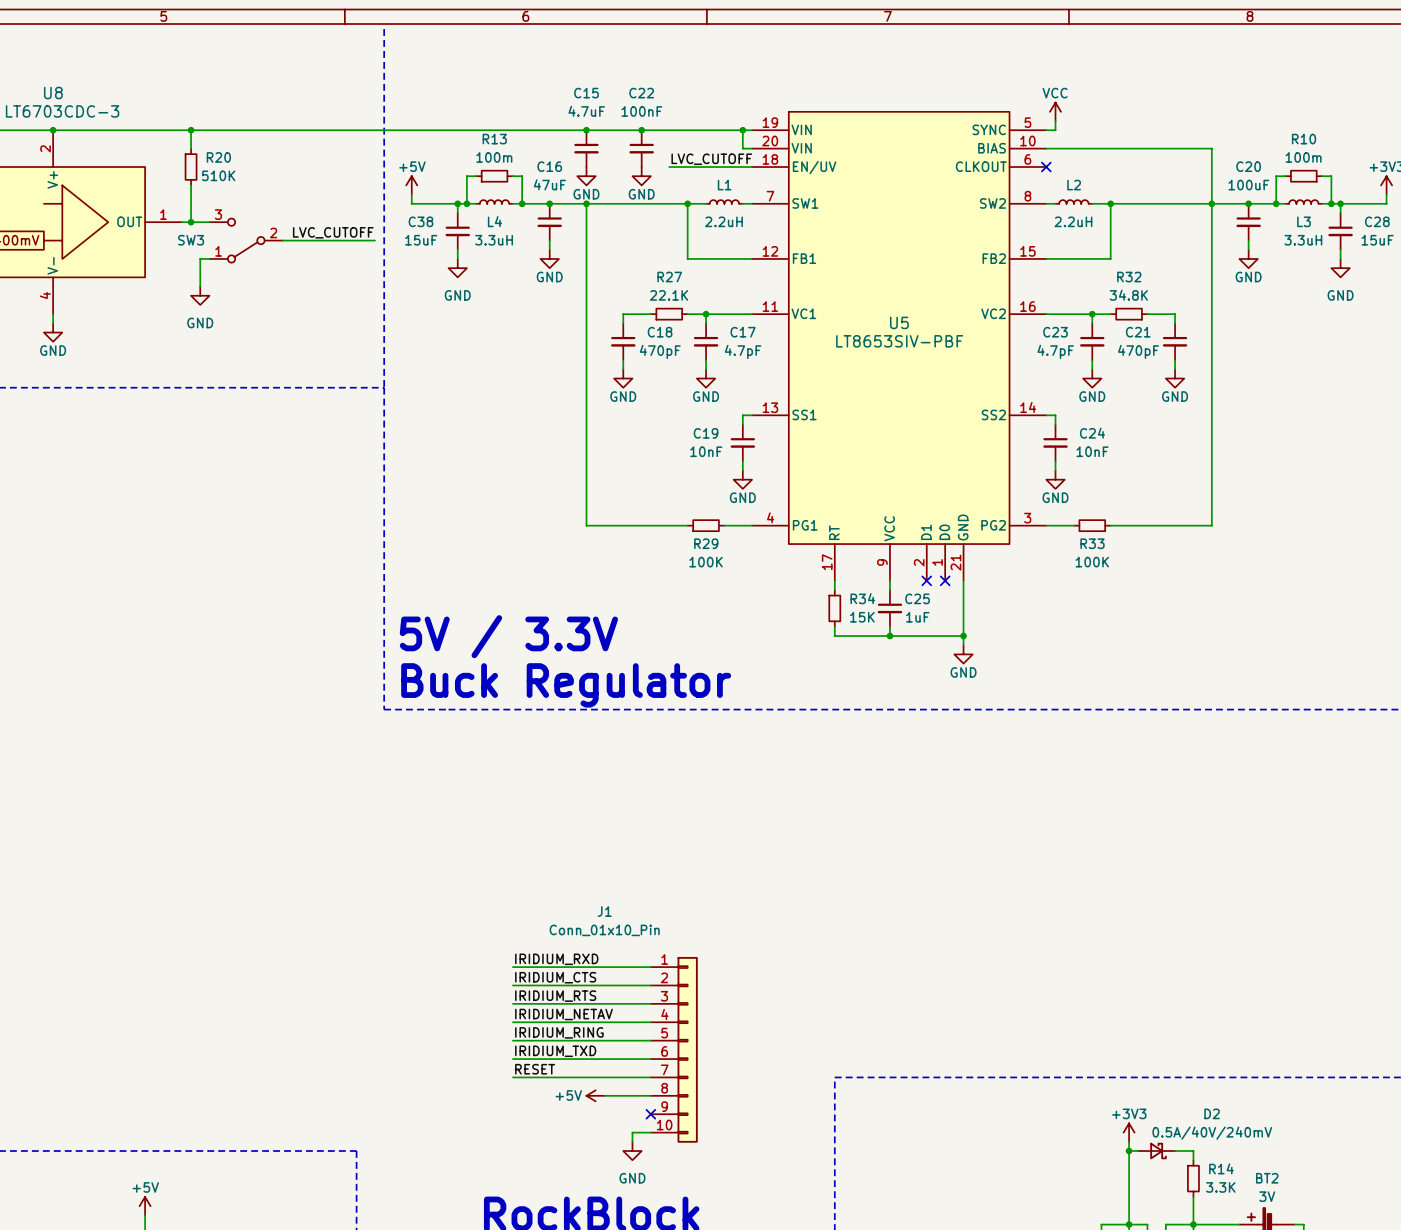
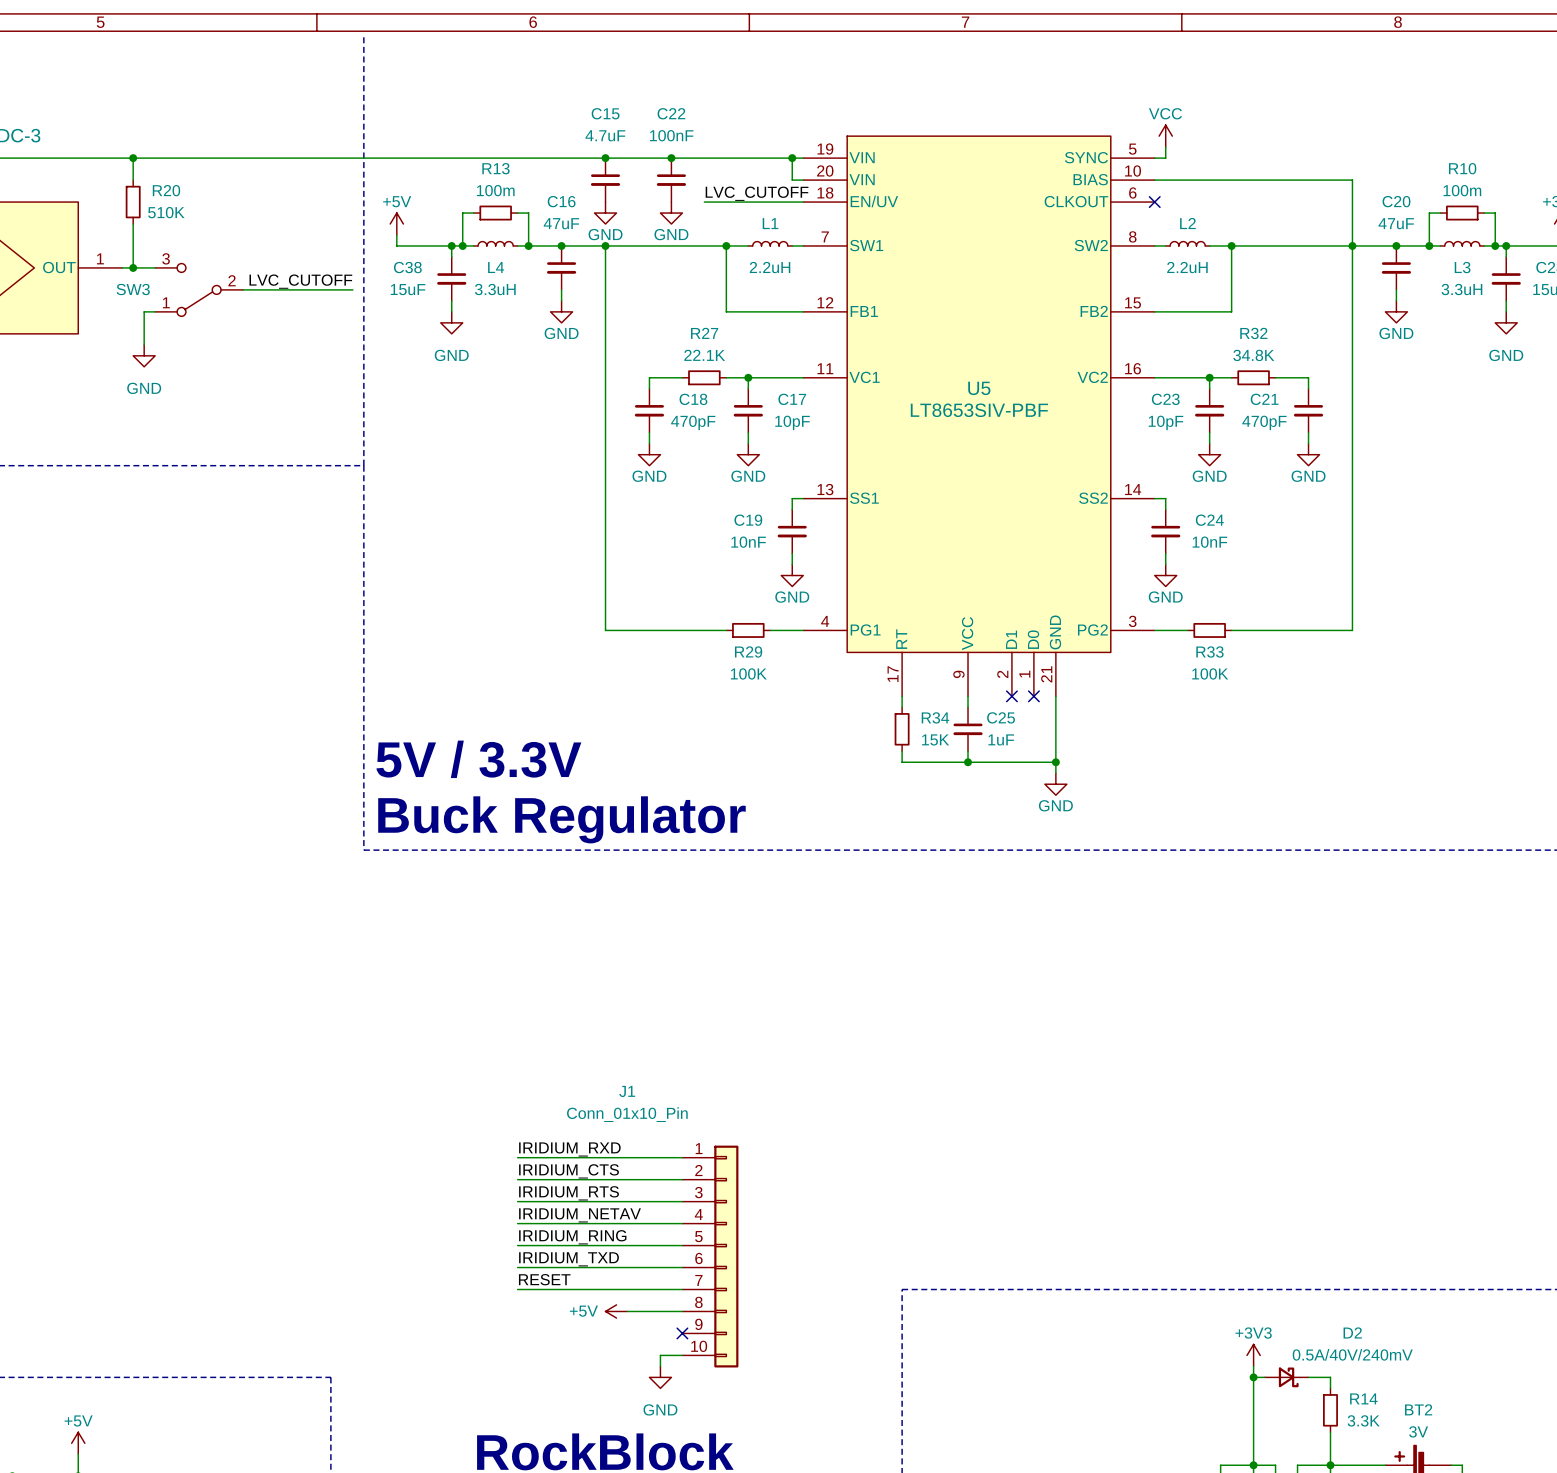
C20 value: 100uF (1248, 185) -> 47uF (1396, 223)
C17 value: 4.7pF (743, 351) -> 10pF (792, 422)
C23 value: 4.7pF (1055, 351) -> 10pF (1166, 422)

